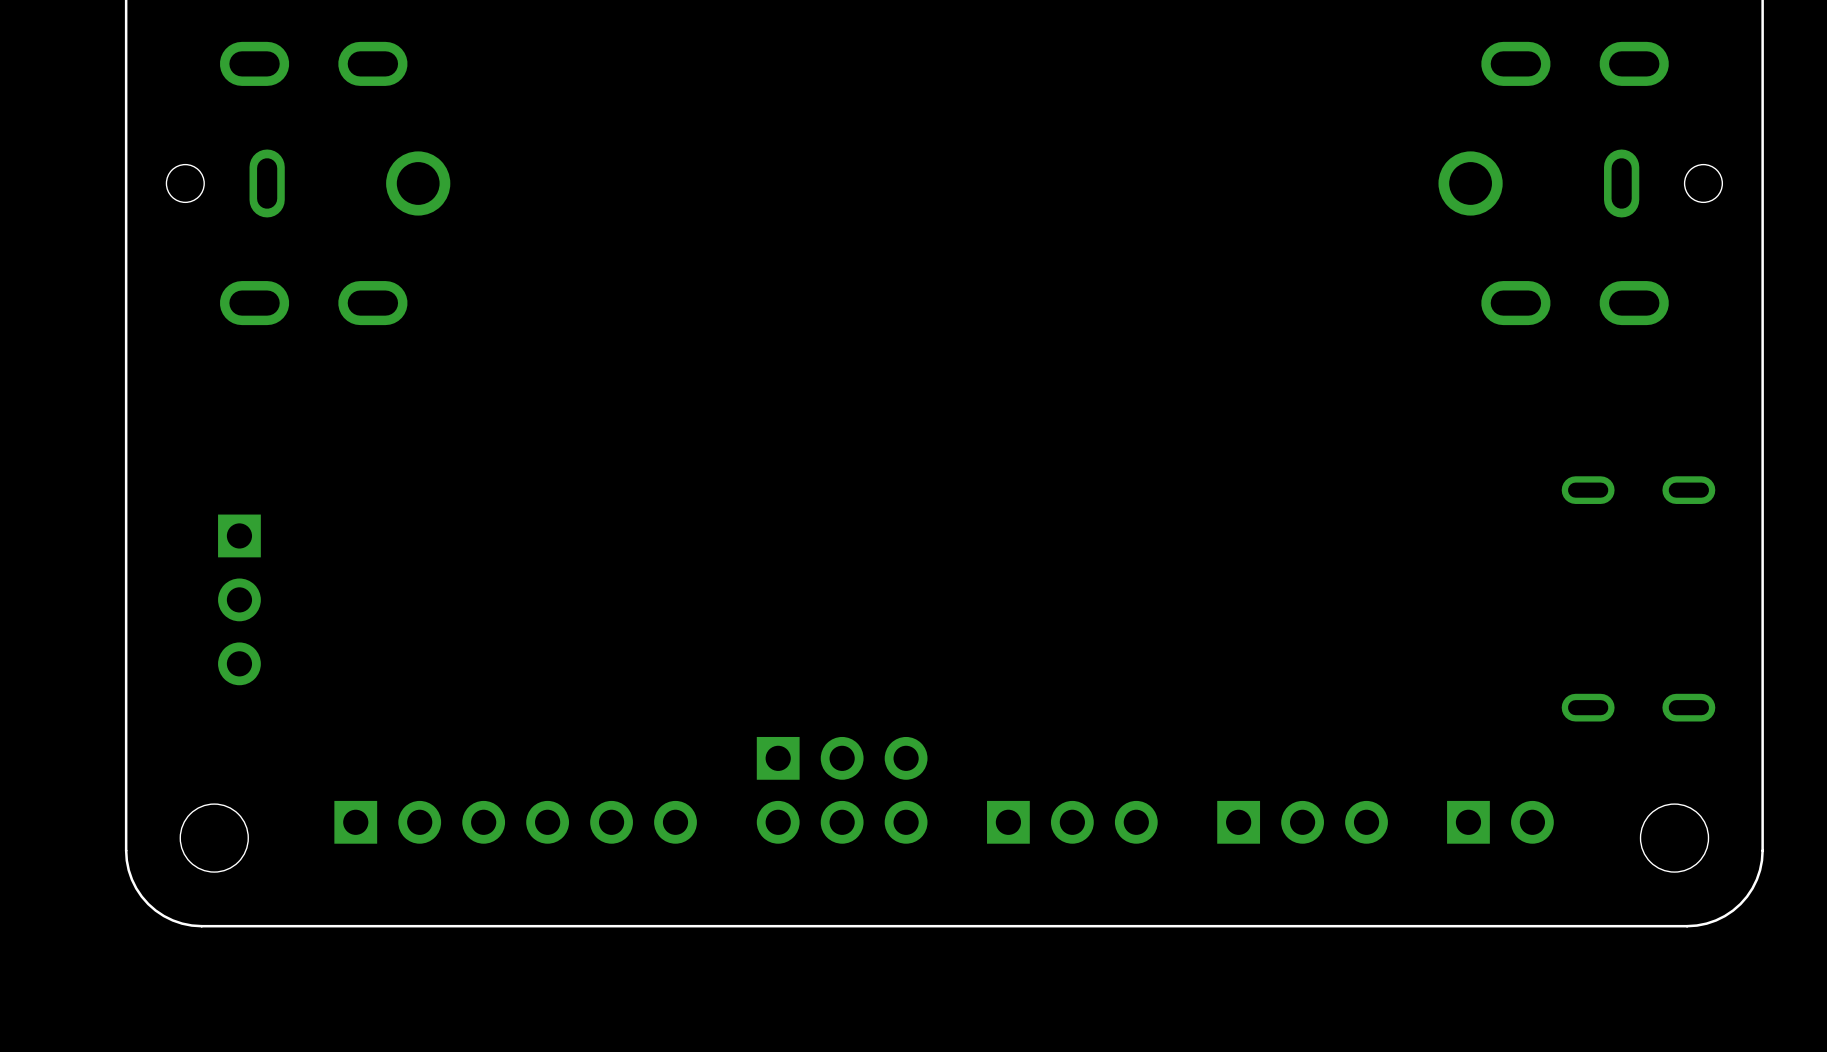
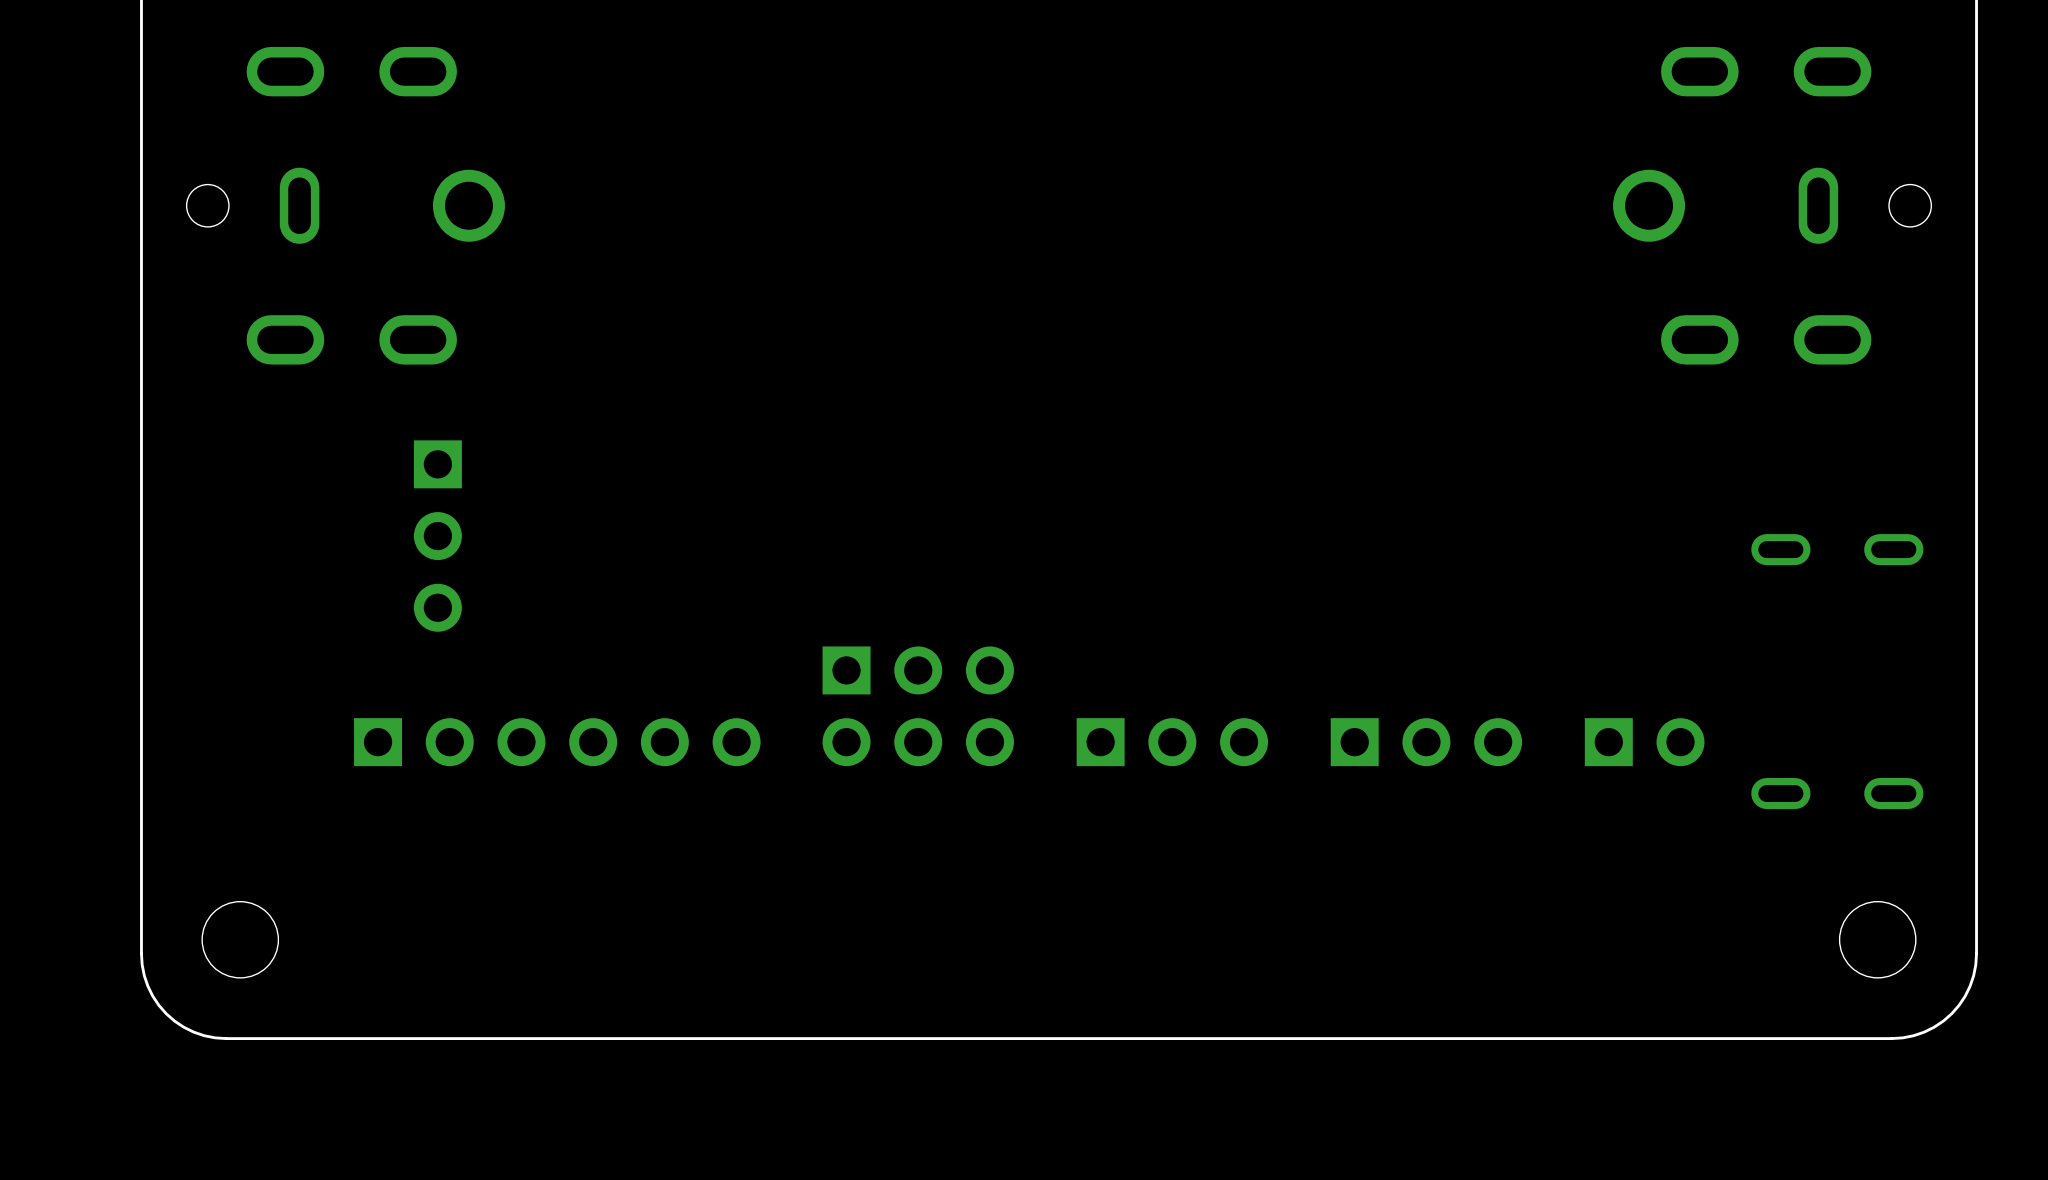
part position: (239, 599) -> (437, 536)
part: none -> (1172, 742)
part: none -> (1426, 742)
part position: (842, 790) -> (918, 706)
part position: (515, 822) -> (557, 742)
part: (1072, 822) -> none
part: (1302, 822) -> none
part position: (1500, 822) -> (1644, 742)

